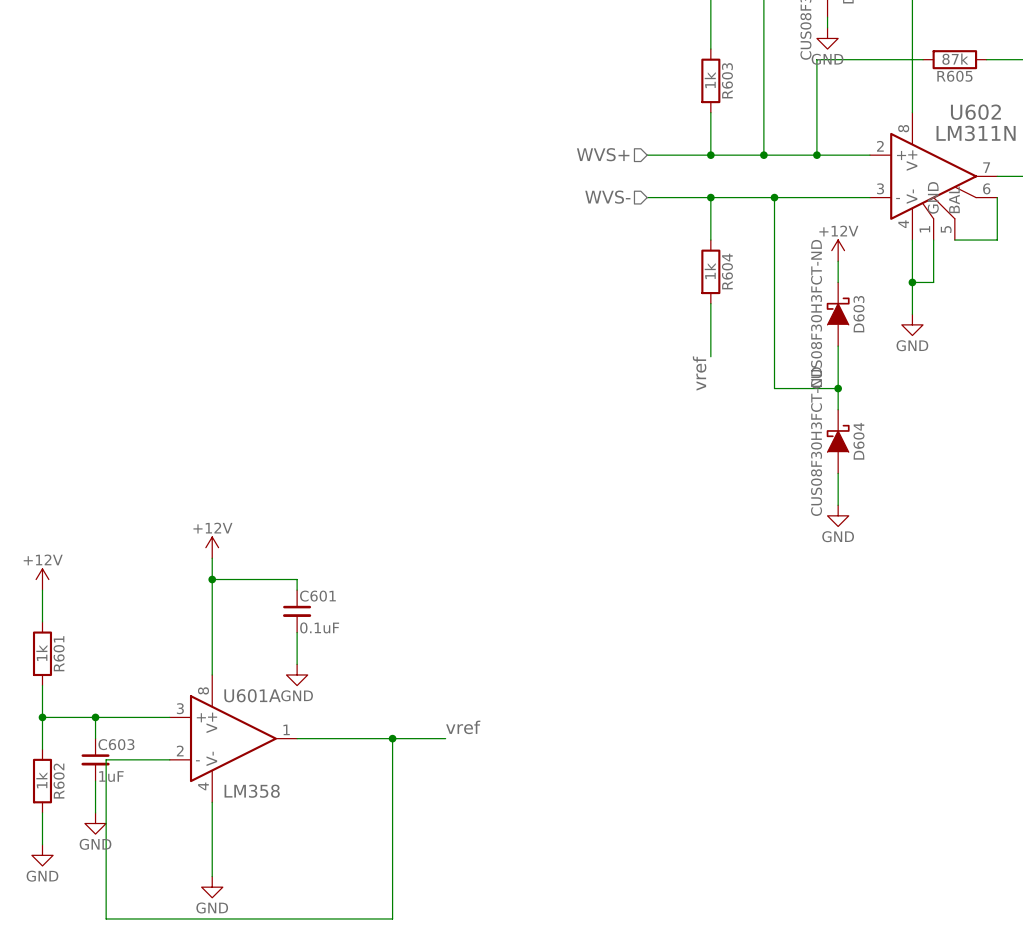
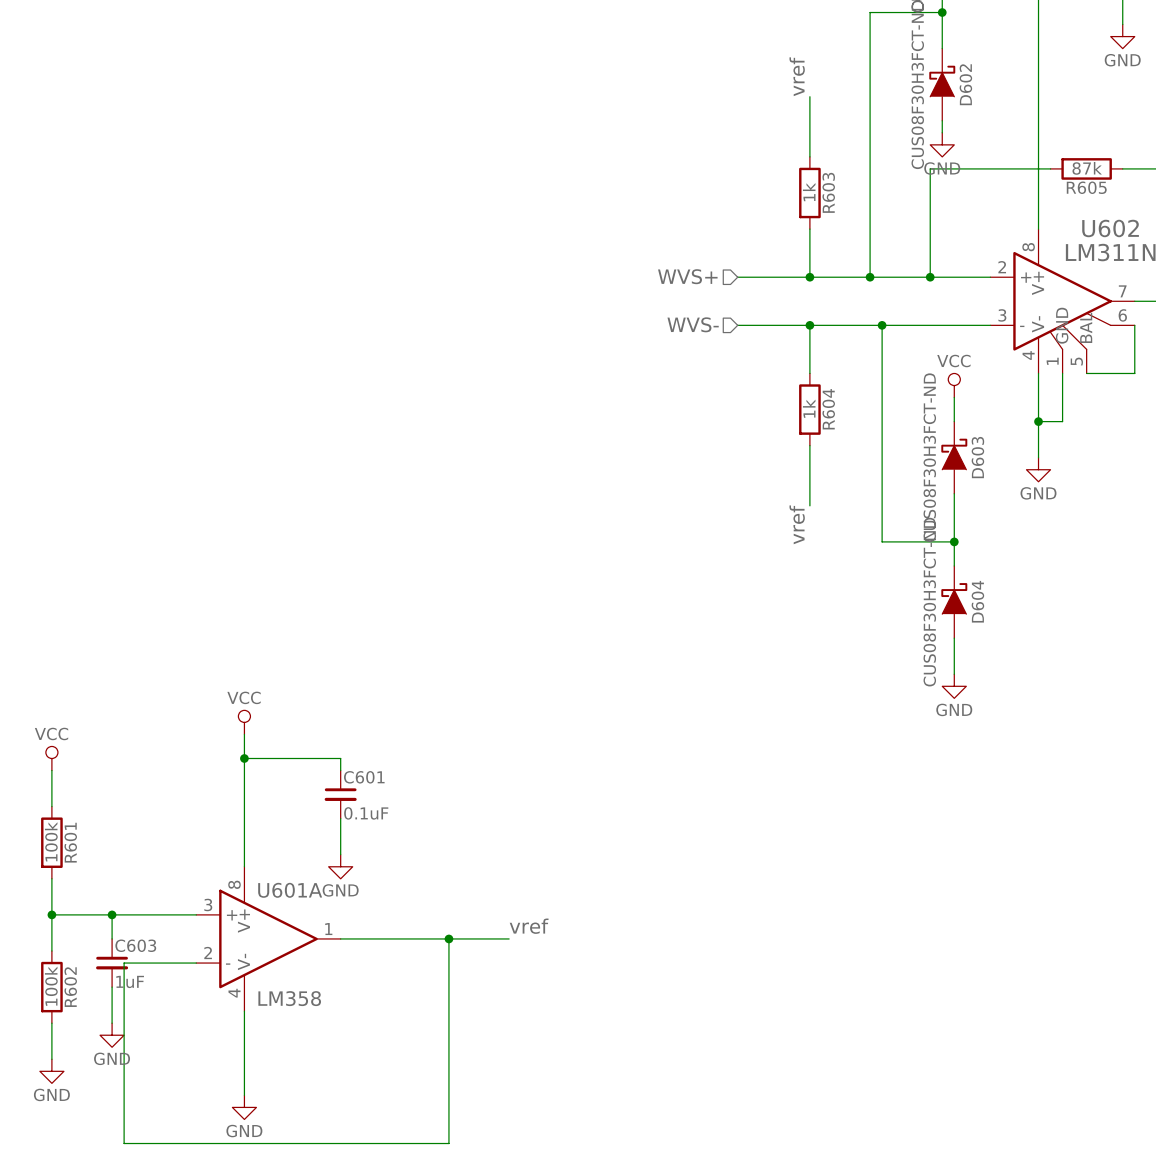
power symbol: +12V (838, 250) -> VCC (954, 385)
power symbol: +12V (212, 547) -> VCC (244, 722)
power symbol: +12V (42, 579) -> VCC (51, 758)
R601 value: 1k (41, 652) -> 100k (51, 841)
R602 value: 1k (41, 780) -> 100k (51, 986)

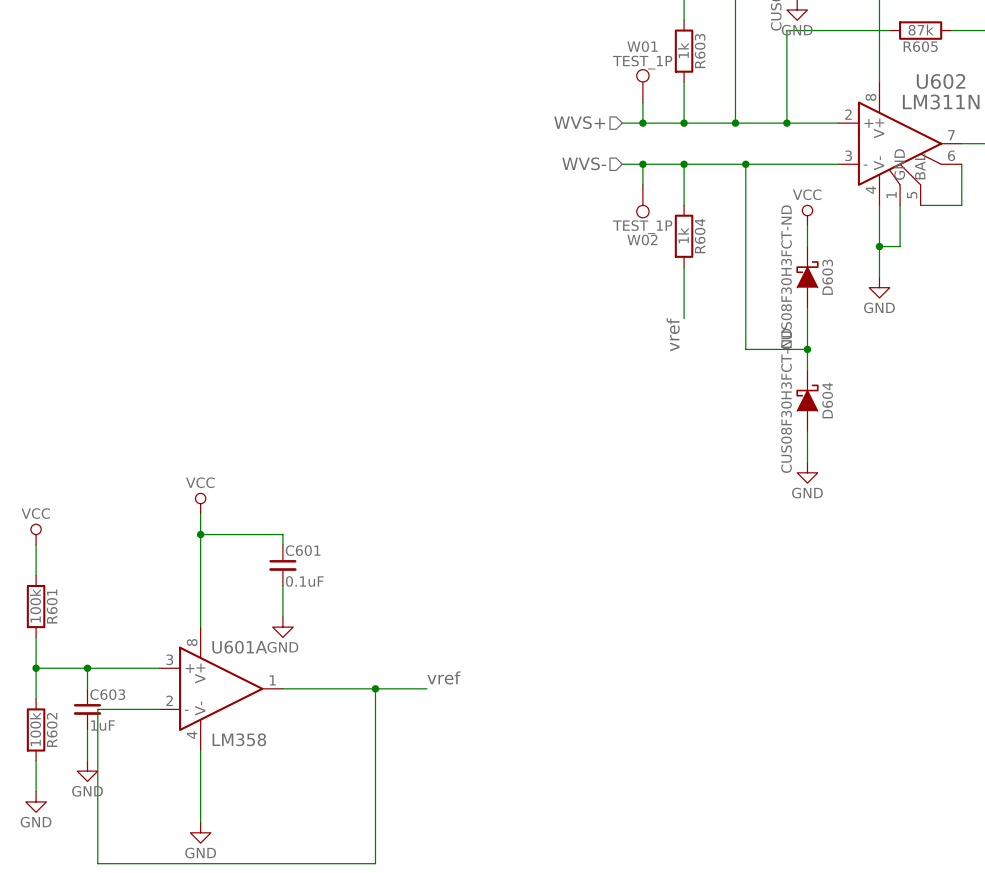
W01: none -> TEST_1P (642, 86)
wire: none -> (642, 102) (642, 123)
junction: none -> (642, 123)
wire: none -> (642, 164) (642, 184)
junction: none -> (642, 164)
W02: none -> TEST_1P (642, 201)

